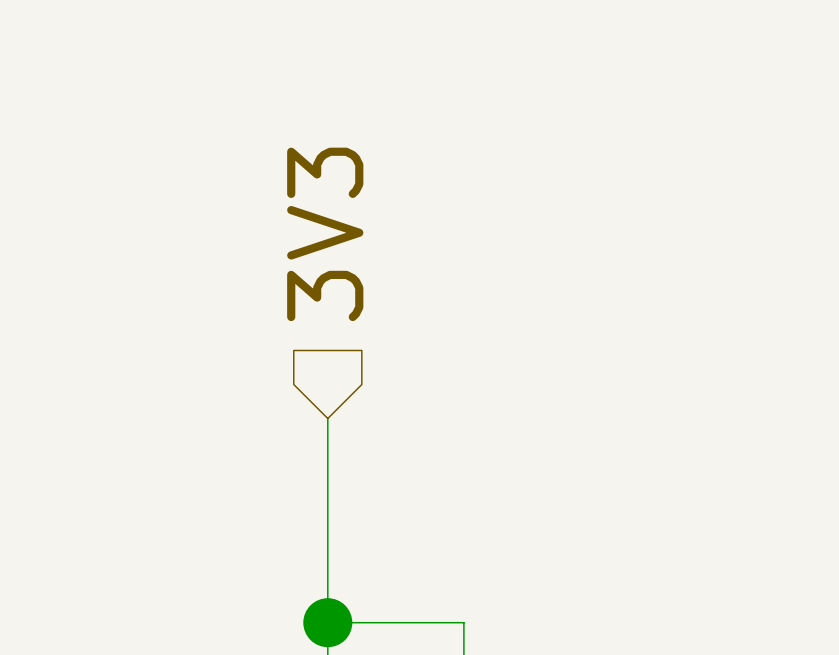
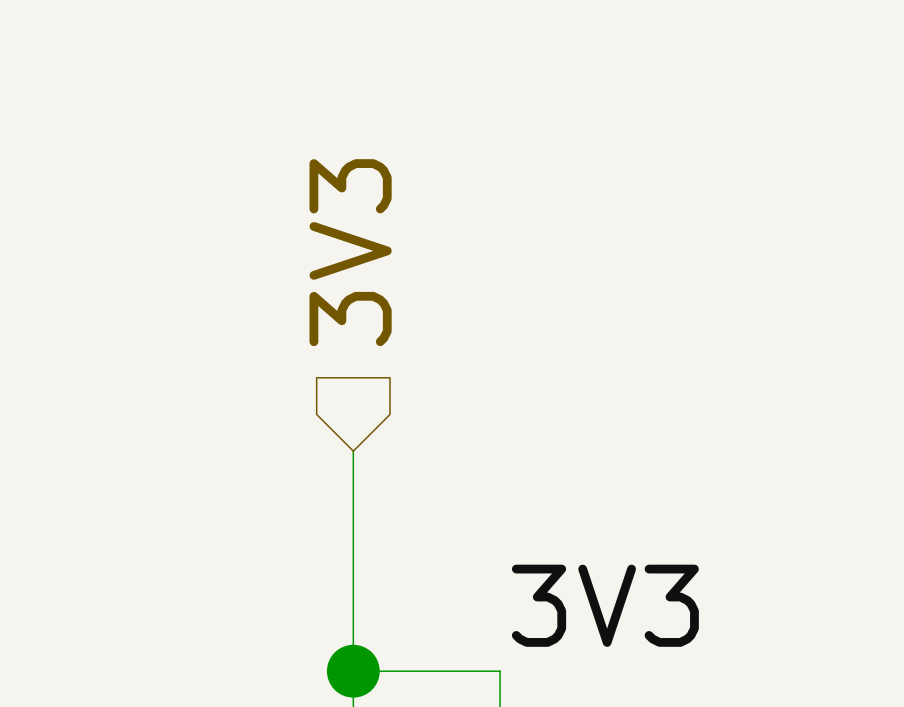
label: none -> 3V3 (605, 605)

